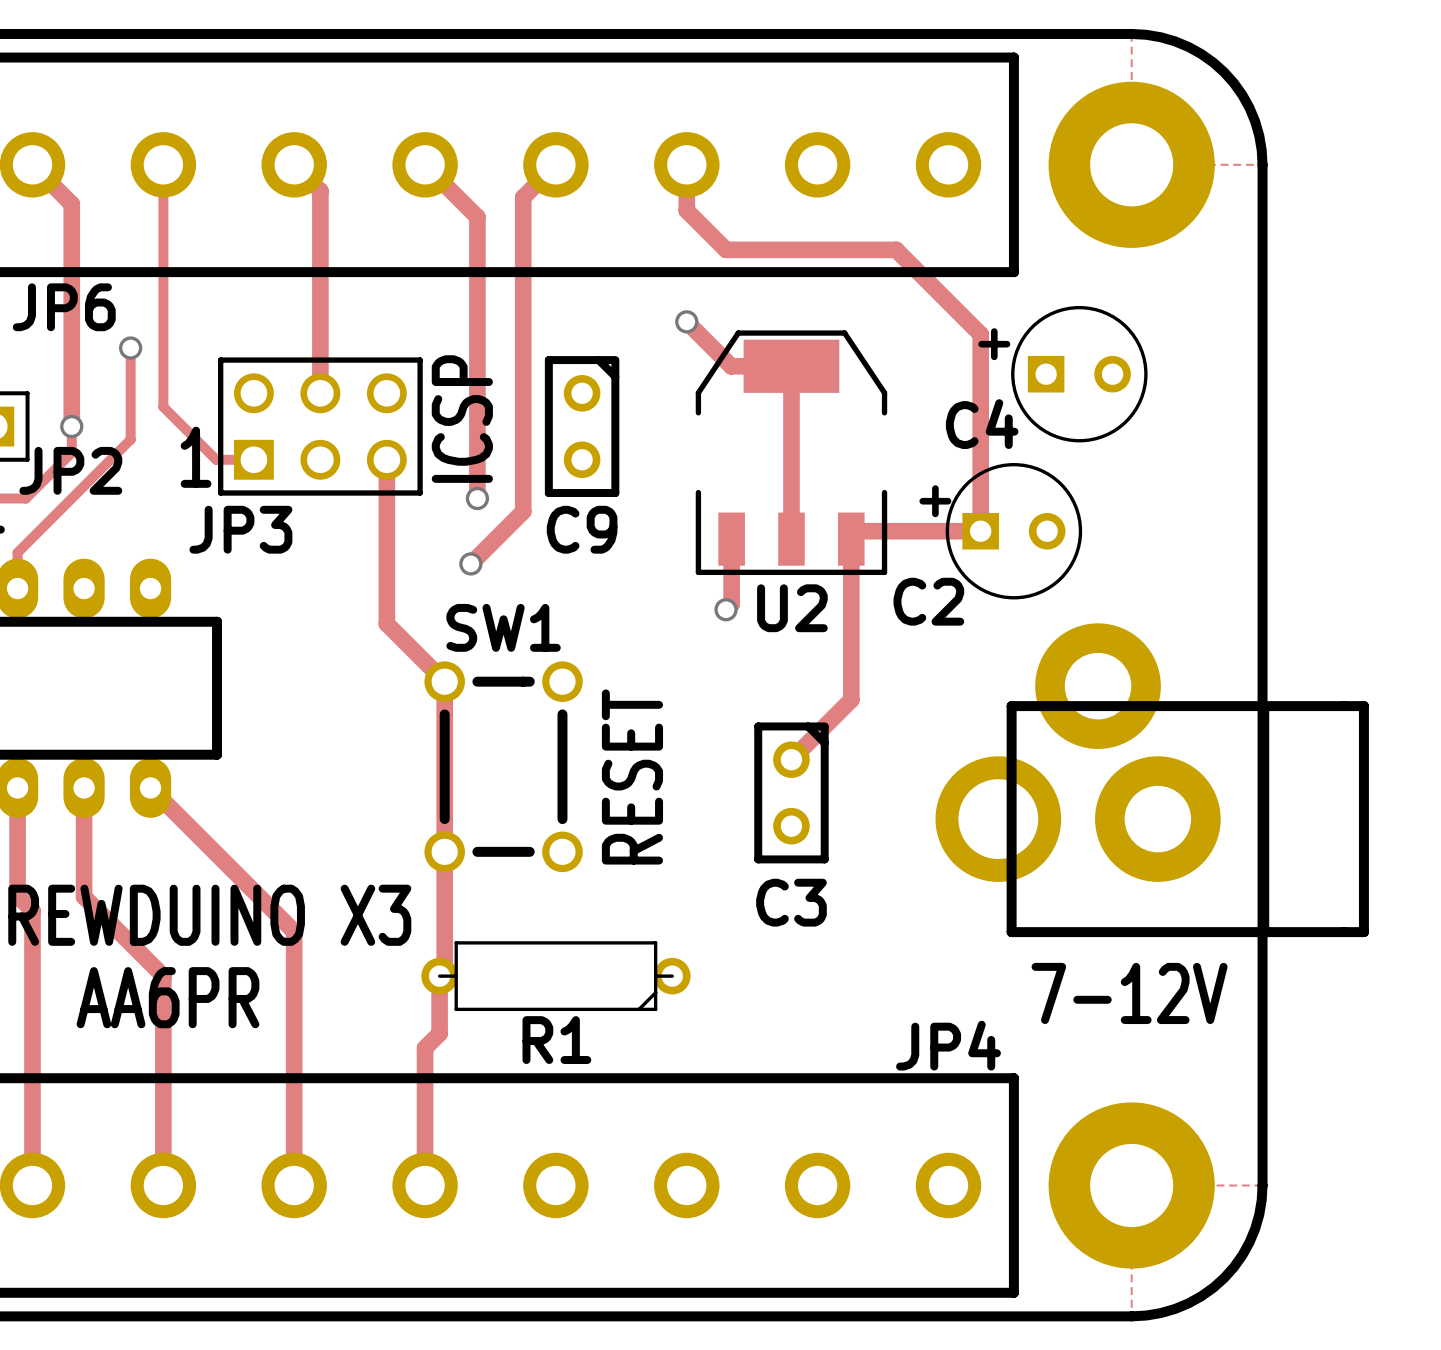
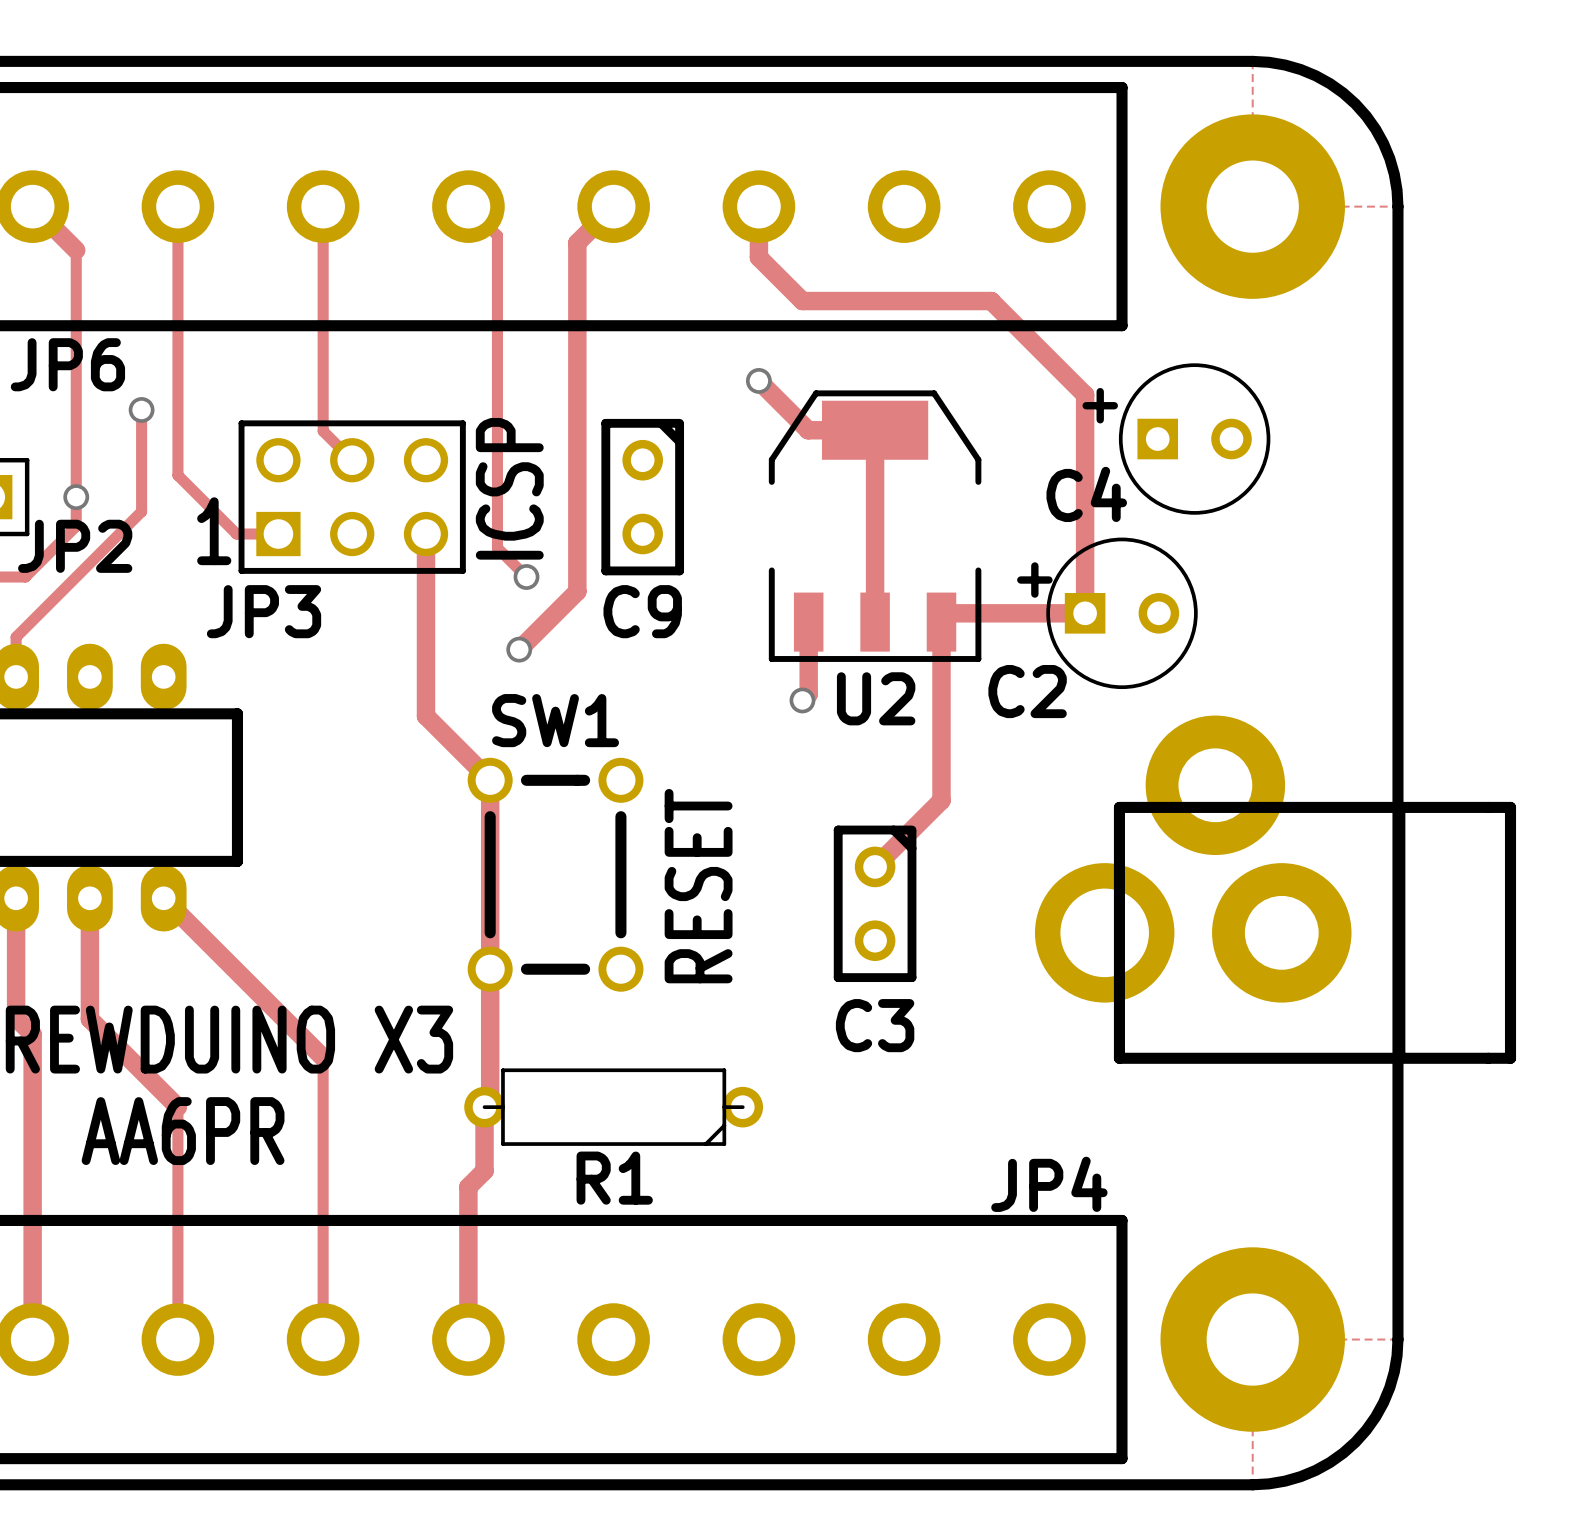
track: (294, 164) (320, 191) (320, 393) -> (323, 206) (323, 431) (352, 460)
track: (451, 190) (477, 217) (477, 498) -> (497, 235) (497, 547) (526, 577)
track width: thick (71, 204) (71, 426) -> thin (76, 250) (76, 497)
track width: thick (294, 931) (294, 1185) -> thin (323, 1057) (323, 1339)
track width: thick (163, 976) (163, 1185) -> thin (177, 1107) (177, 1339)
text: 7-12V (1129, 993) -> none

